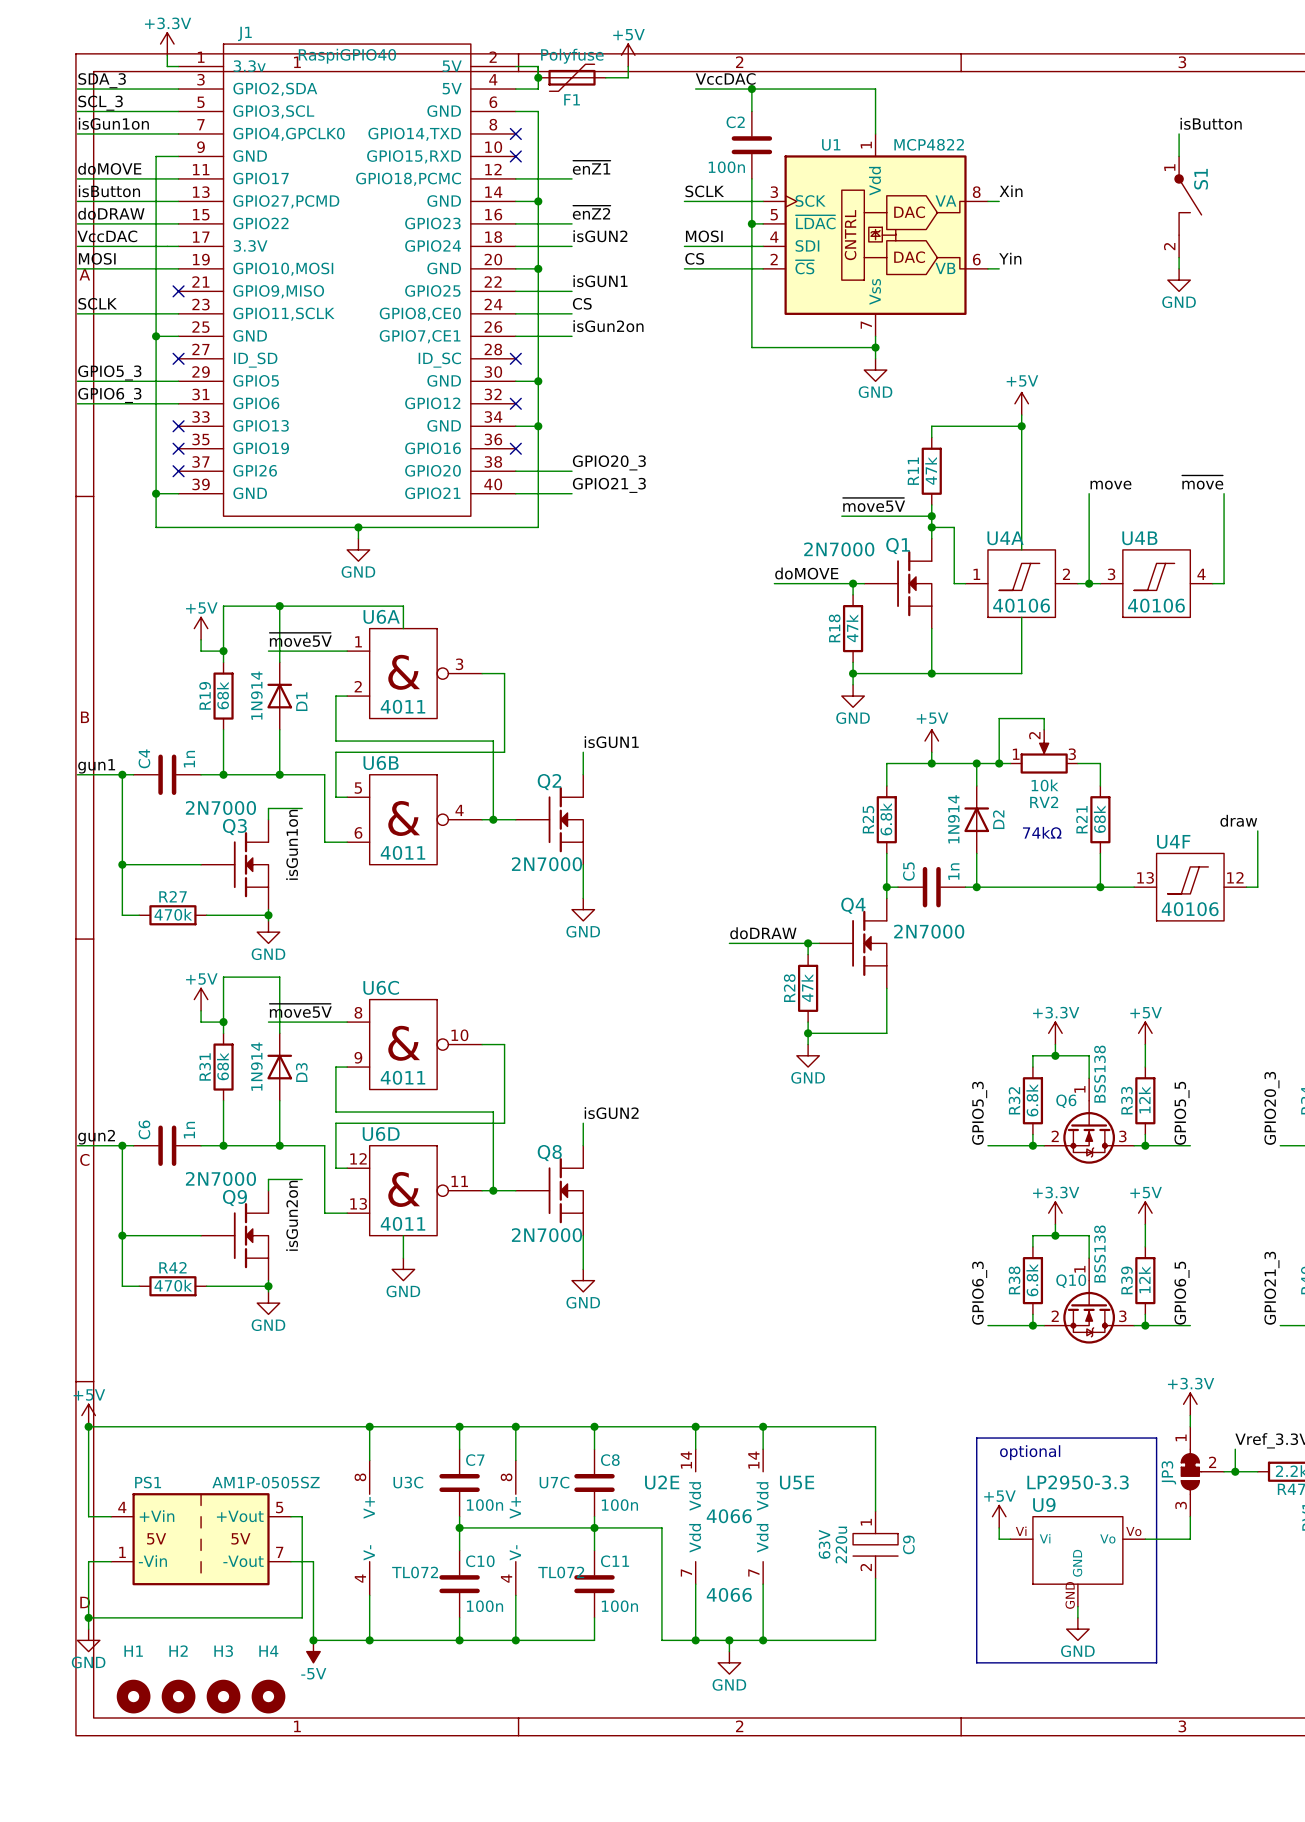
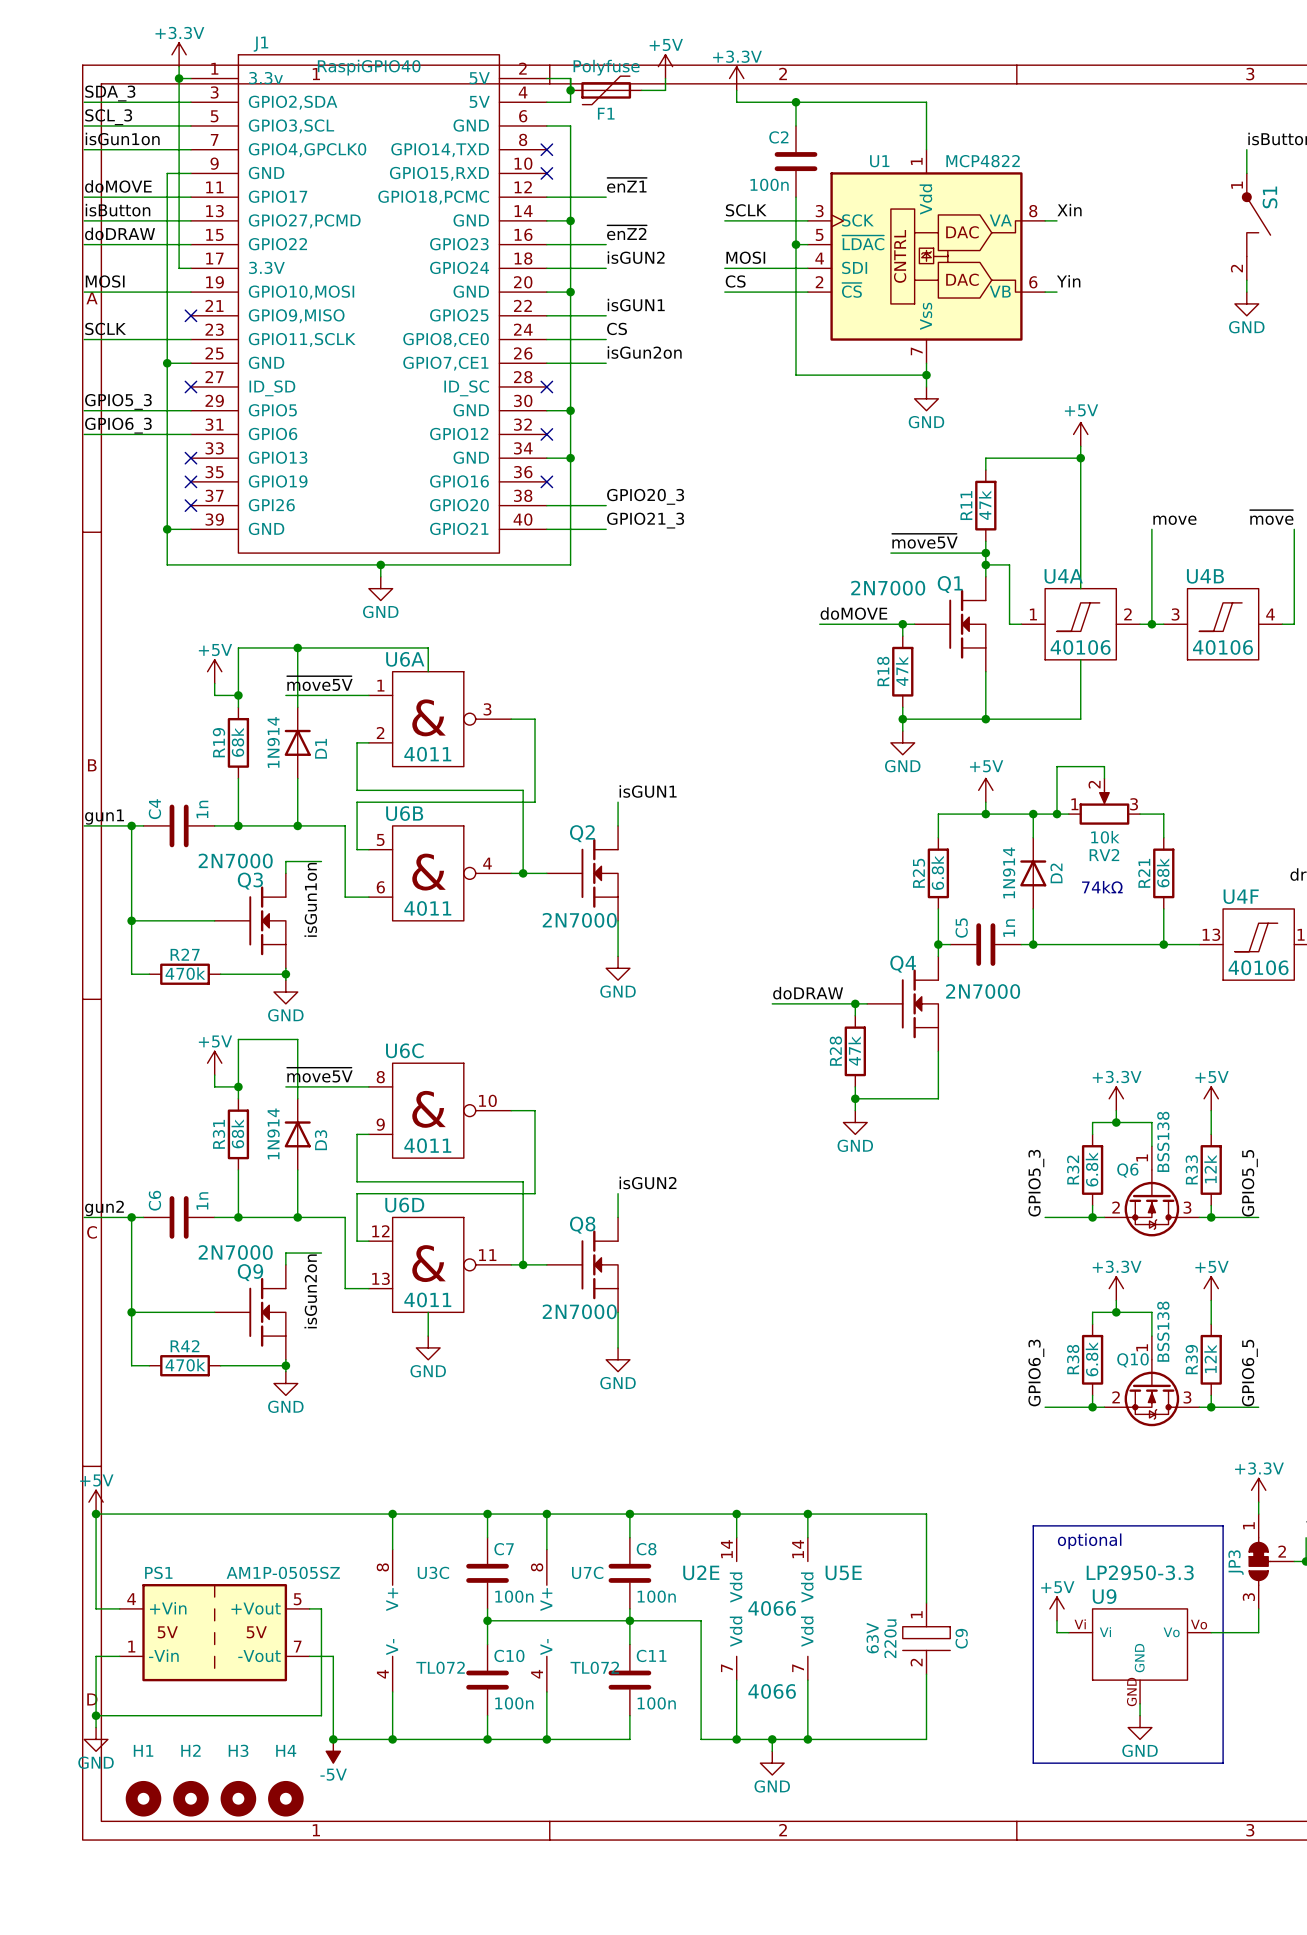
junction: none -> (179, 78)
power symbol: none -> +3.3V (736, 78)
wire: none -> (736, 90) (736, 102)
label: VccDAC (725, 78) -> none
label: VccDAC (107, 236) -> none
wire: (77, 246) (167, 246) -> (179, 78) (179, 268)

